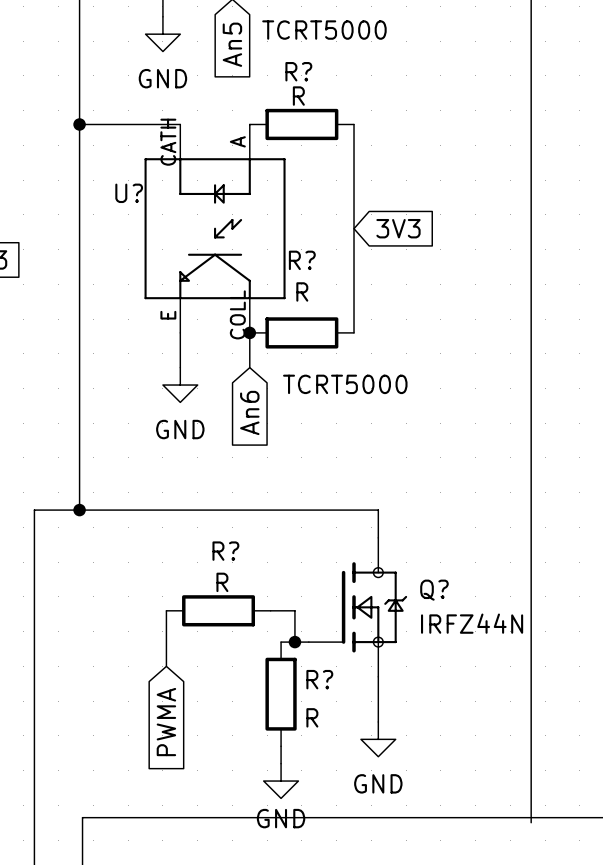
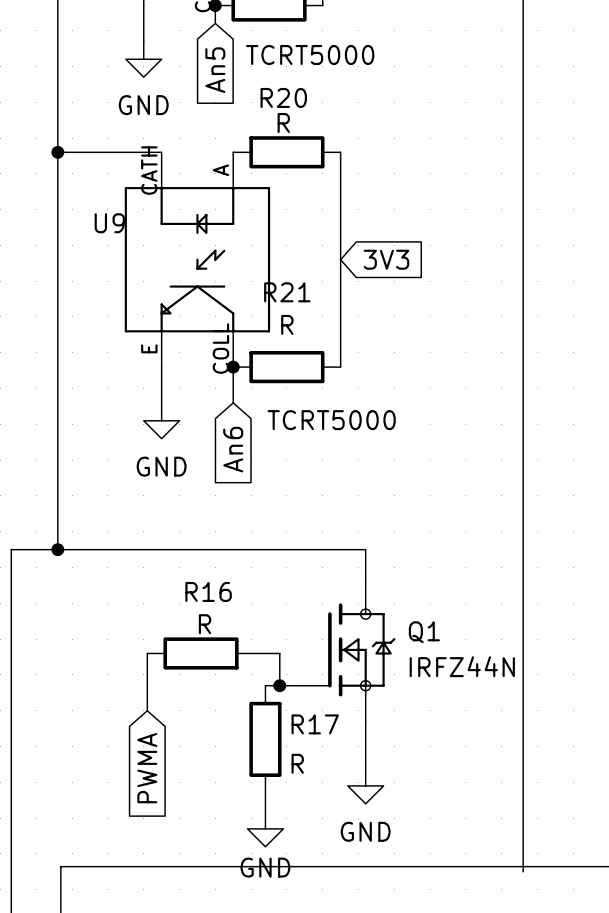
R? name: R? (298, 71) -> R20 (283, 97)
U? name: U? (129, 193) -> U9 (109, 223)
R? name: R? (302, 260) -> R21 (287, 292)
R? name: R? (225, 551) -> R16 (208, 591)
Q? name: Q? (434, 590) -> Q1 (424, 632)
R? name: R? (319, 679) -> R17 (315, 724)

